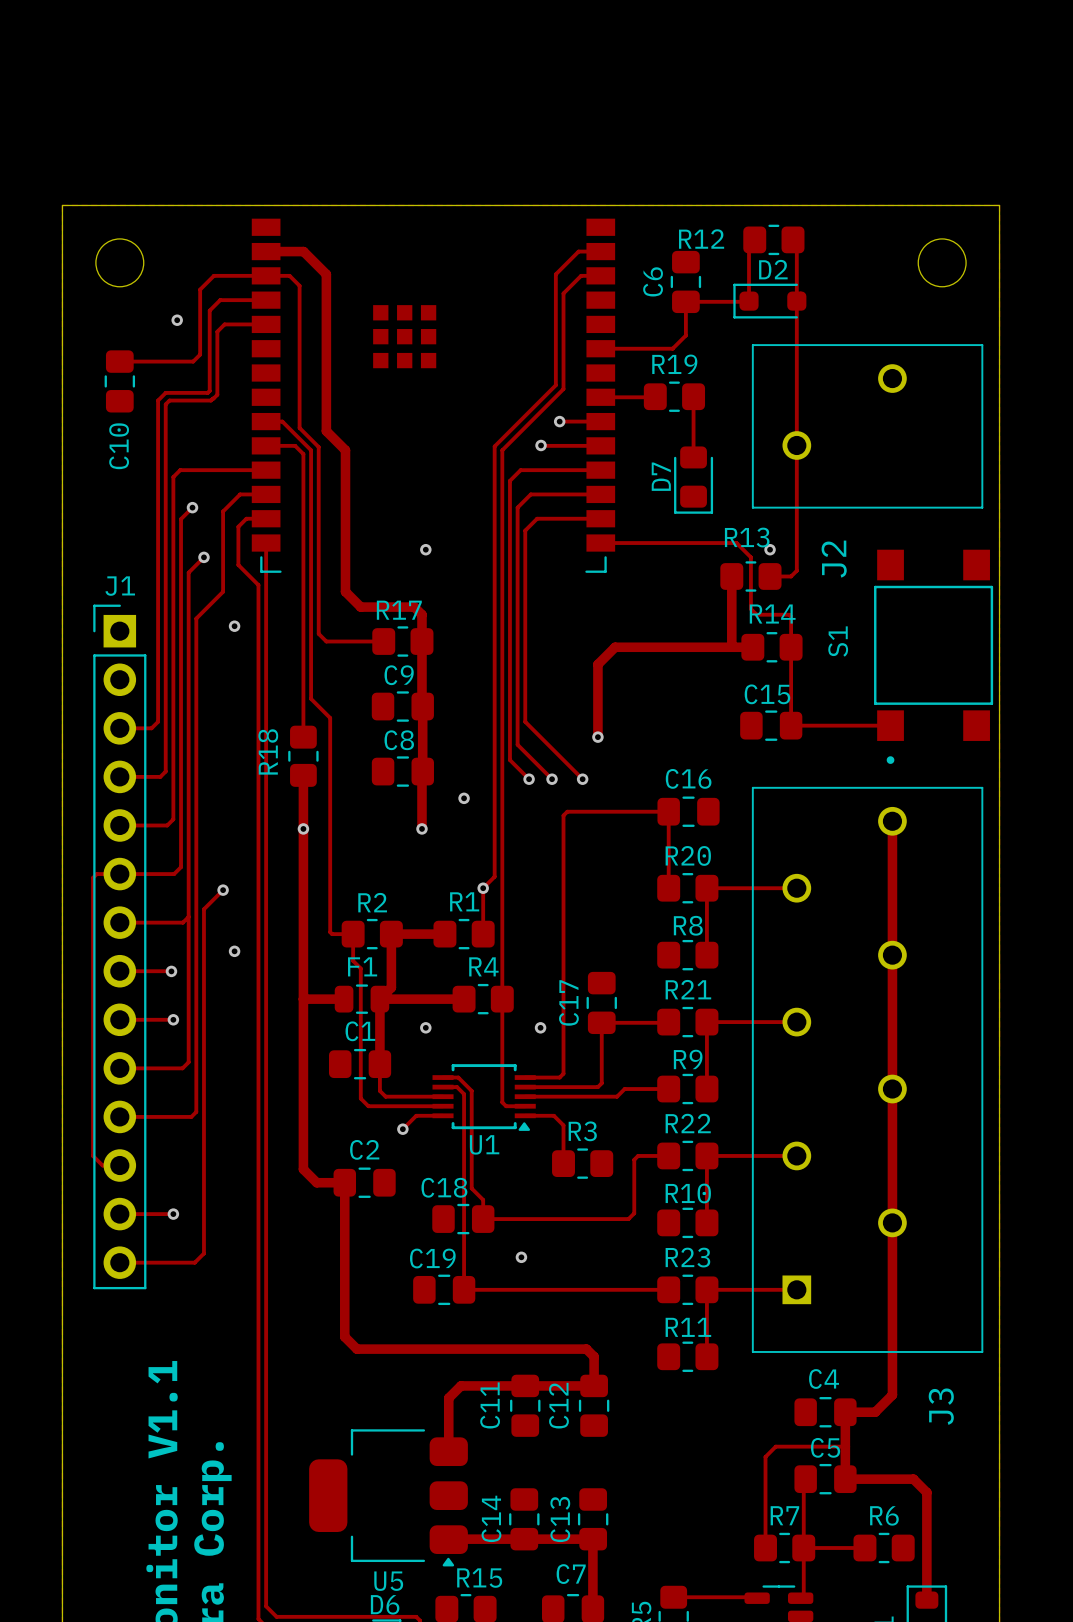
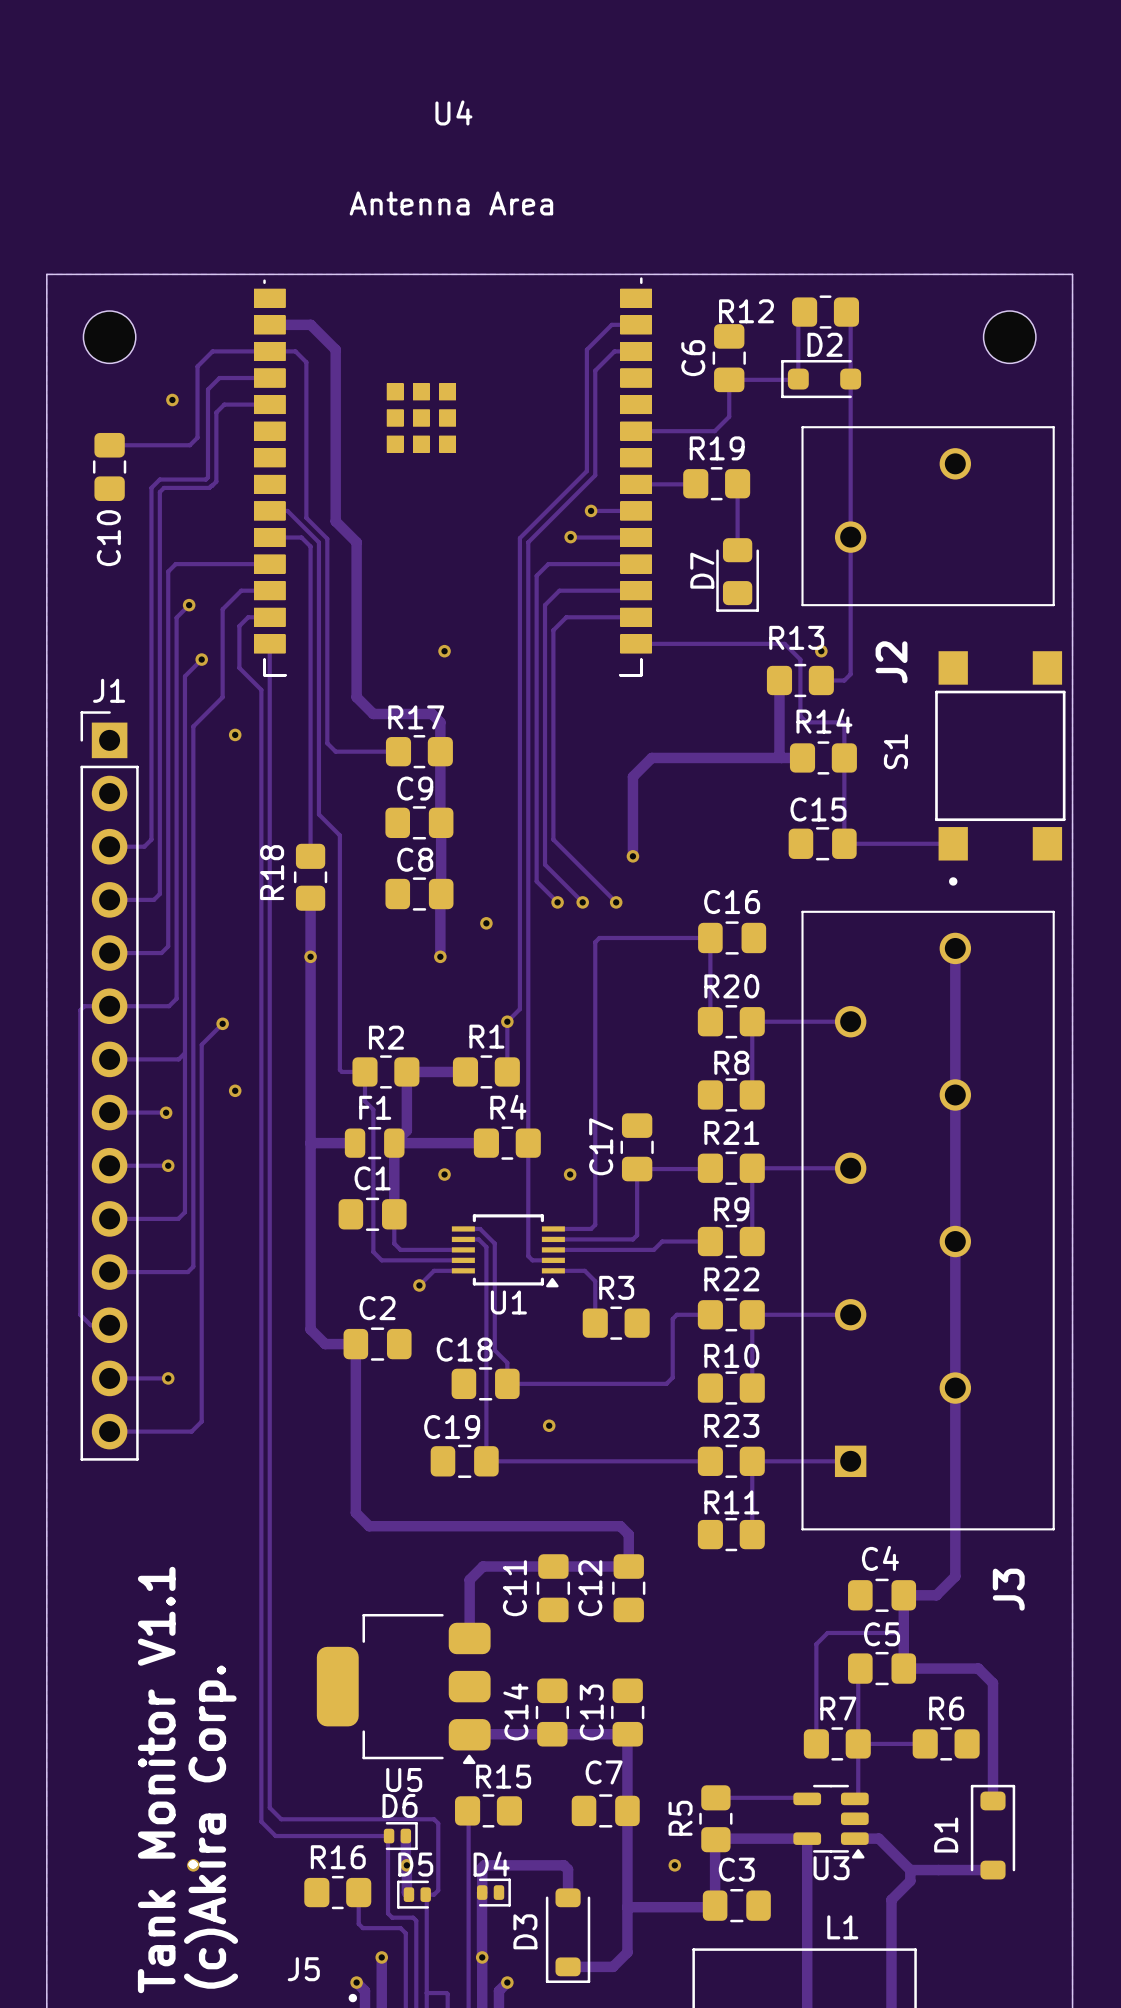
U4: none -> (452, 476)

